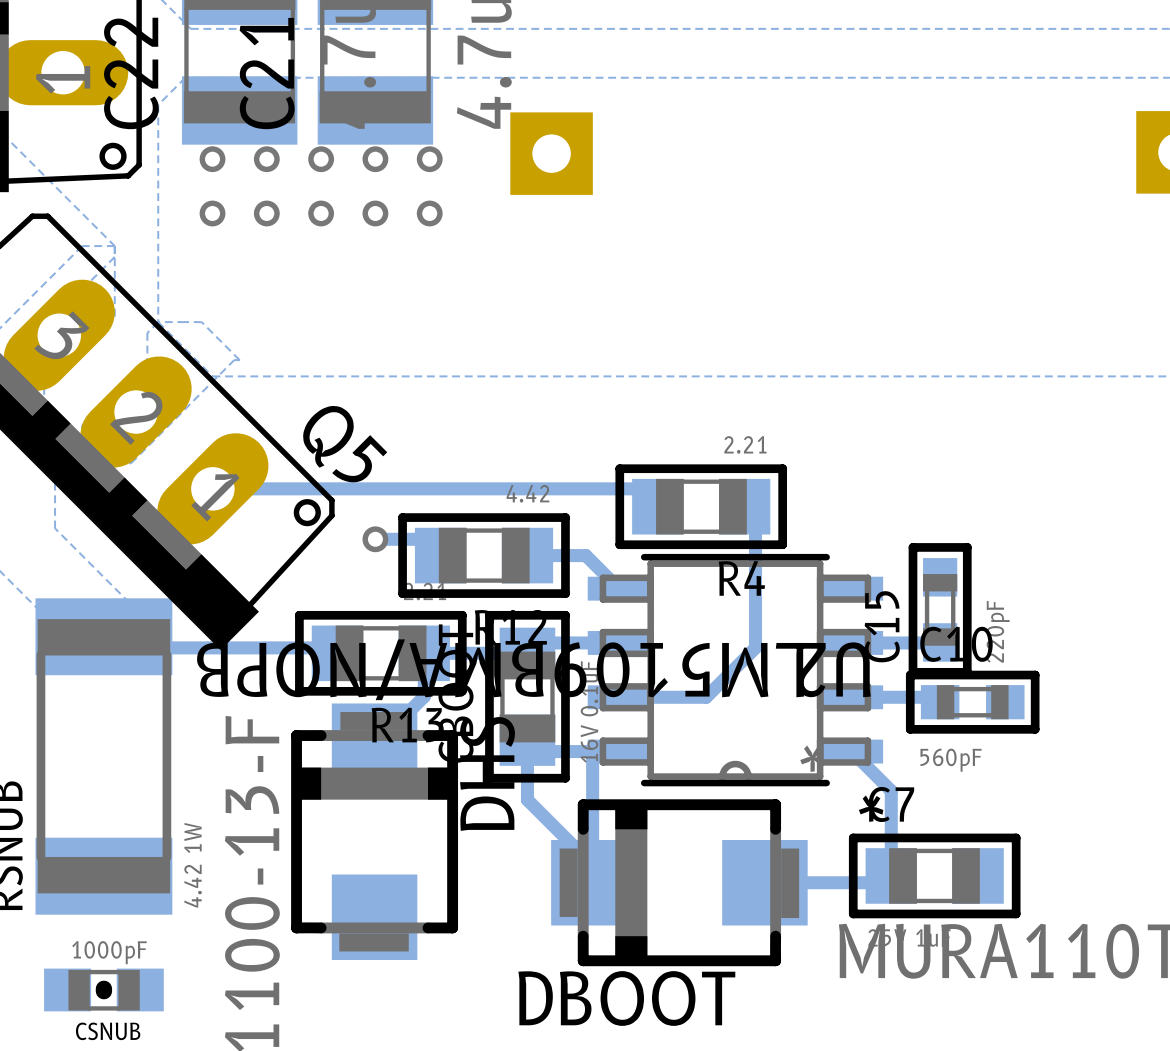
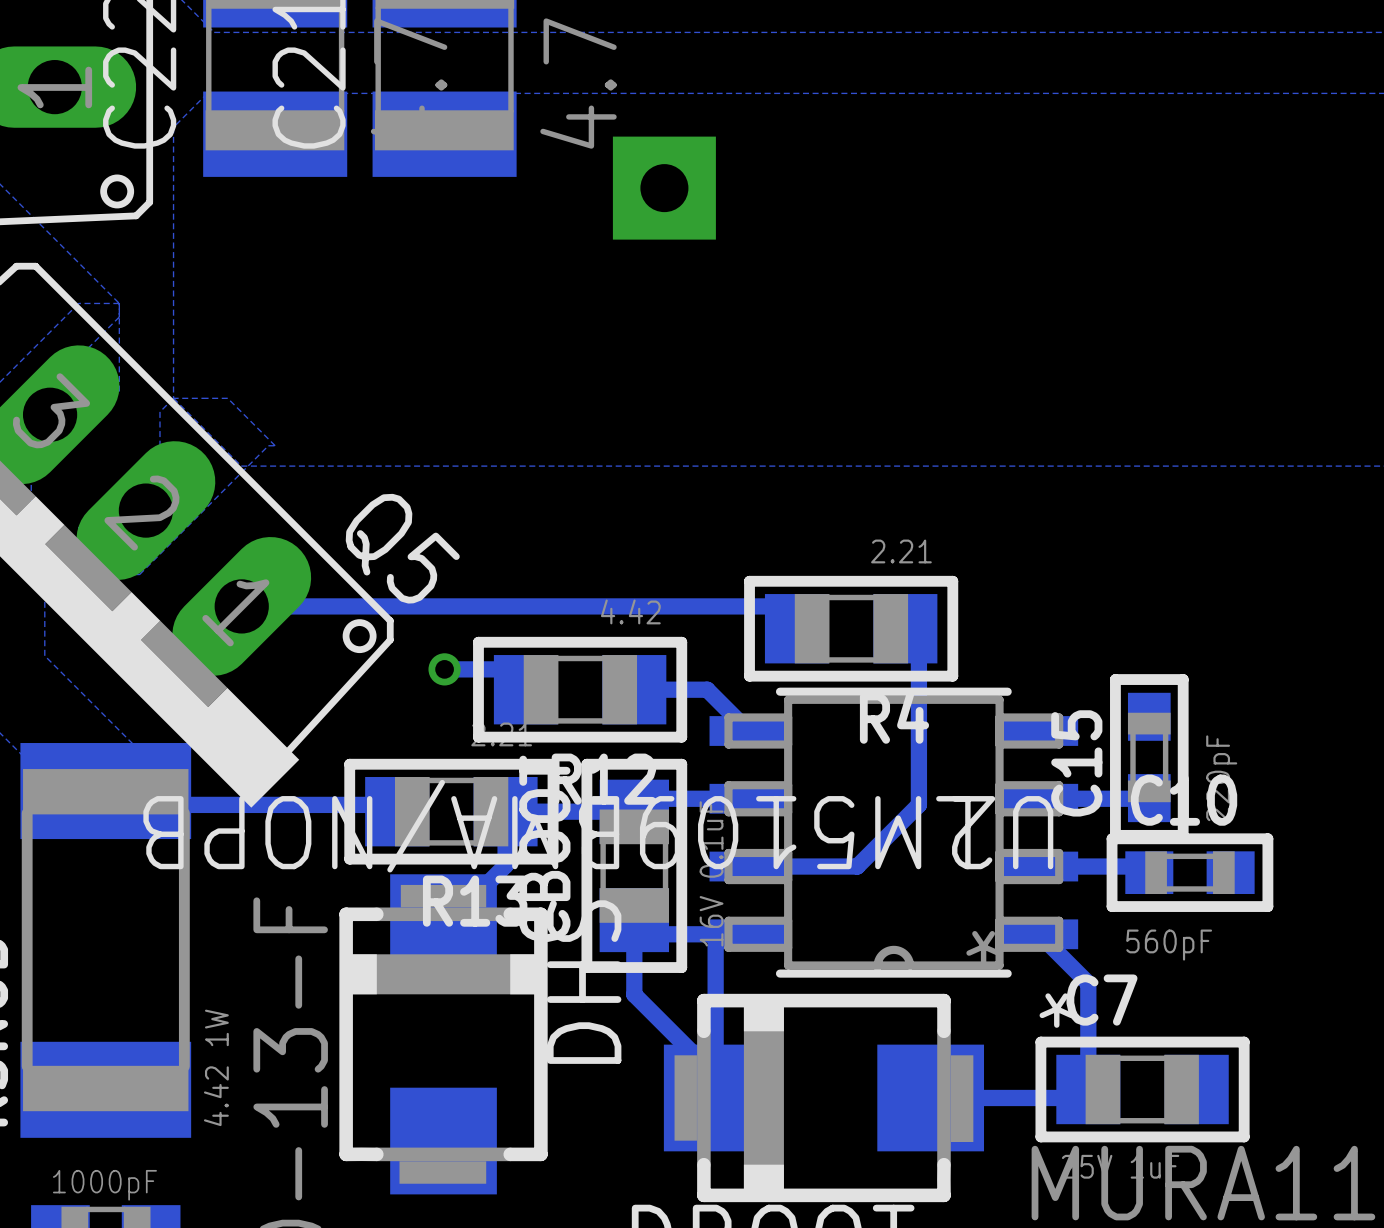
via: (212, 159) -> none
via: (266, 159) -> none
via: (321, 159) -> none
via: (375, 159) -> none
via: (429, 159) -> none
via: (212, 213) -> none
via: (266, 213) -> none
via: (321, 213) -> none
via: (375, 213) -> none
via: (429, 213) -> none

